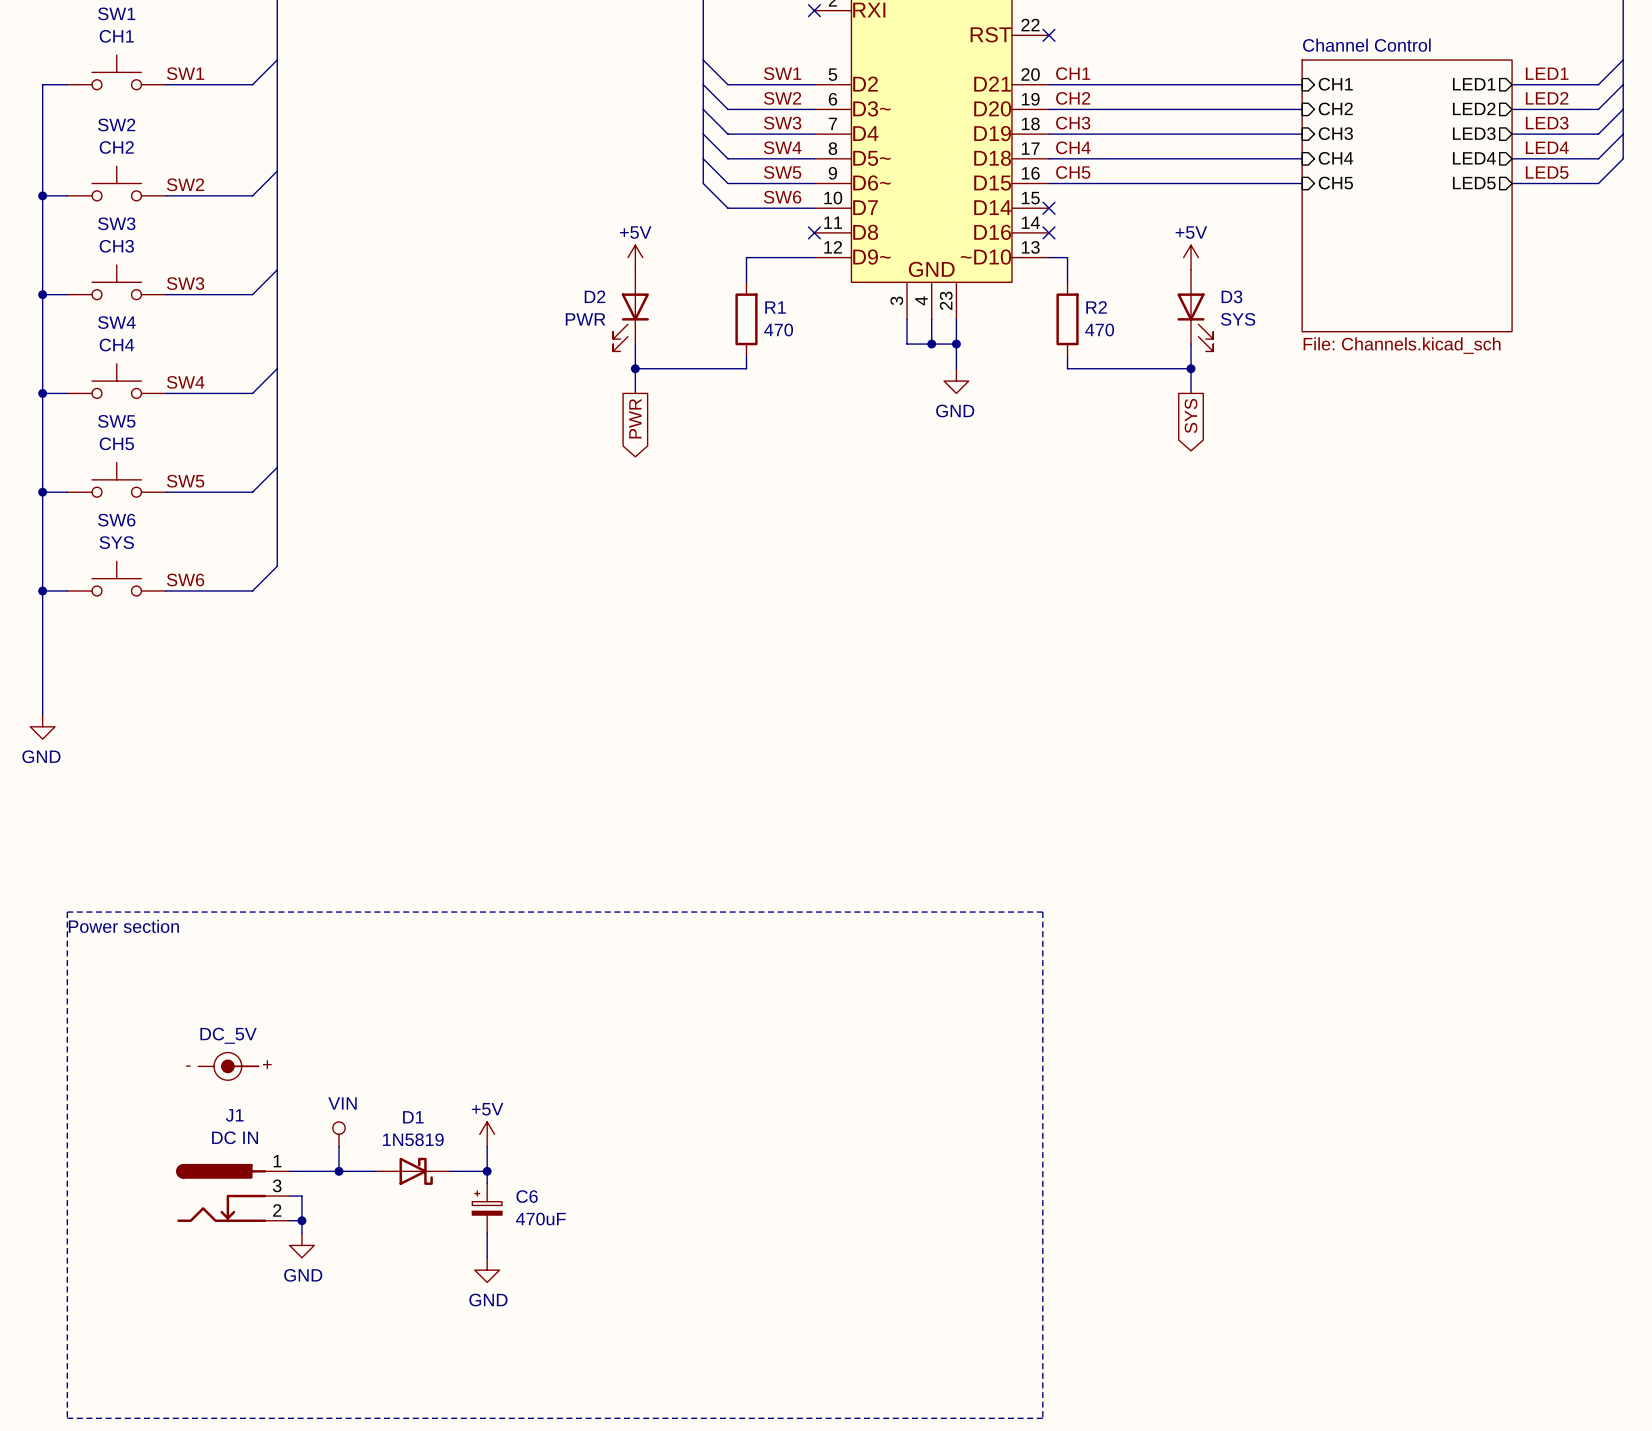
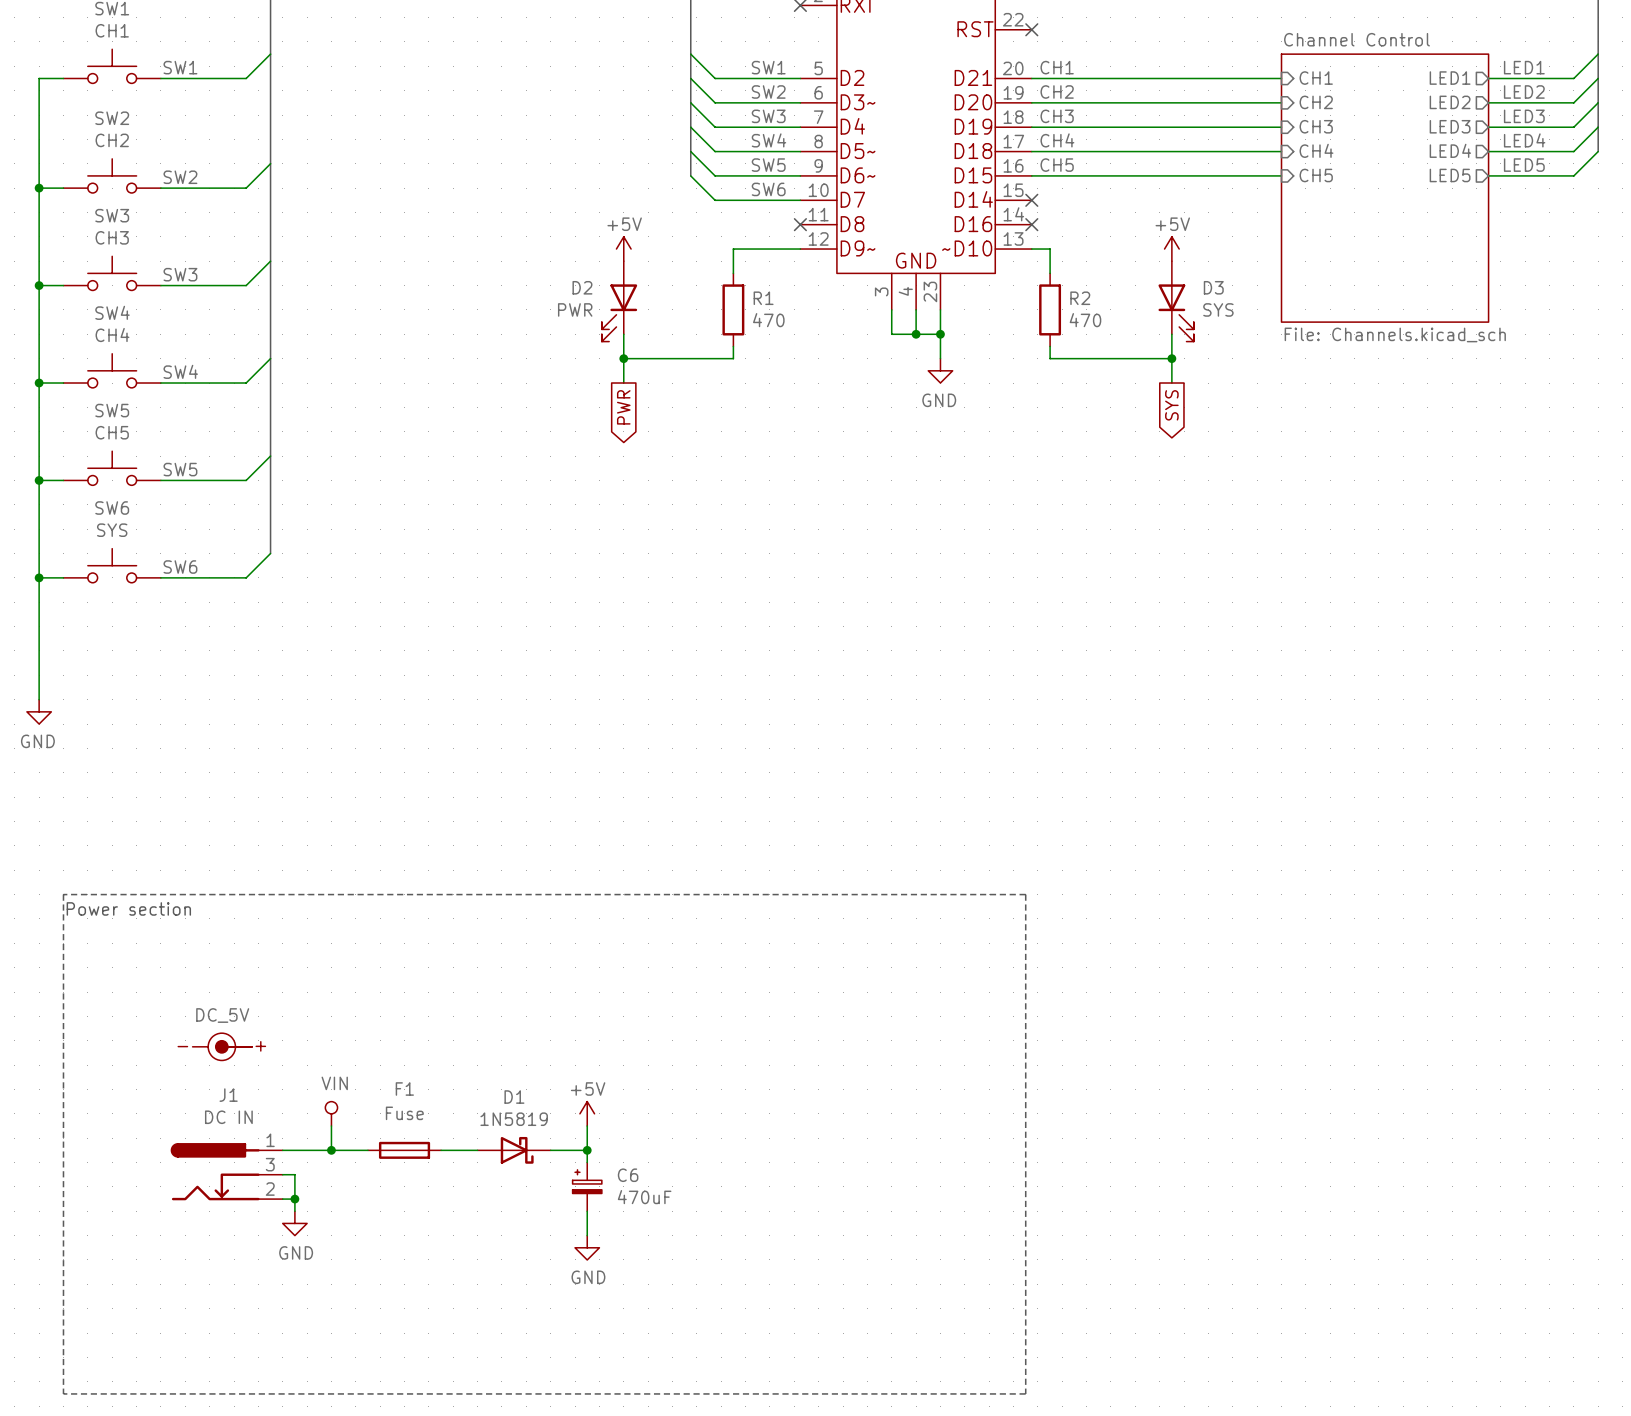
power symbol position: +5V (487, 1134) -> +5V (587, 1113)
wire: (487, 1146) (487, 1183) -> (587, 1125) (587, 1162)
D1 position: (413, 1171) -> (514, 1150)
F1: none -> Fuse (404, 1150)
junction: (487, 1171) -> none
wire: none -> (550, 1150) (587, 1150)
junction: none -> (587, 1150)
C6 position: (487, 1208) -> (587, 1186)
wire: (487, 1233) (487, 1257) -> (587, 1211) (587, 1235)
power symbol position: GND (487, 1270) -> GND (587, 1247)

